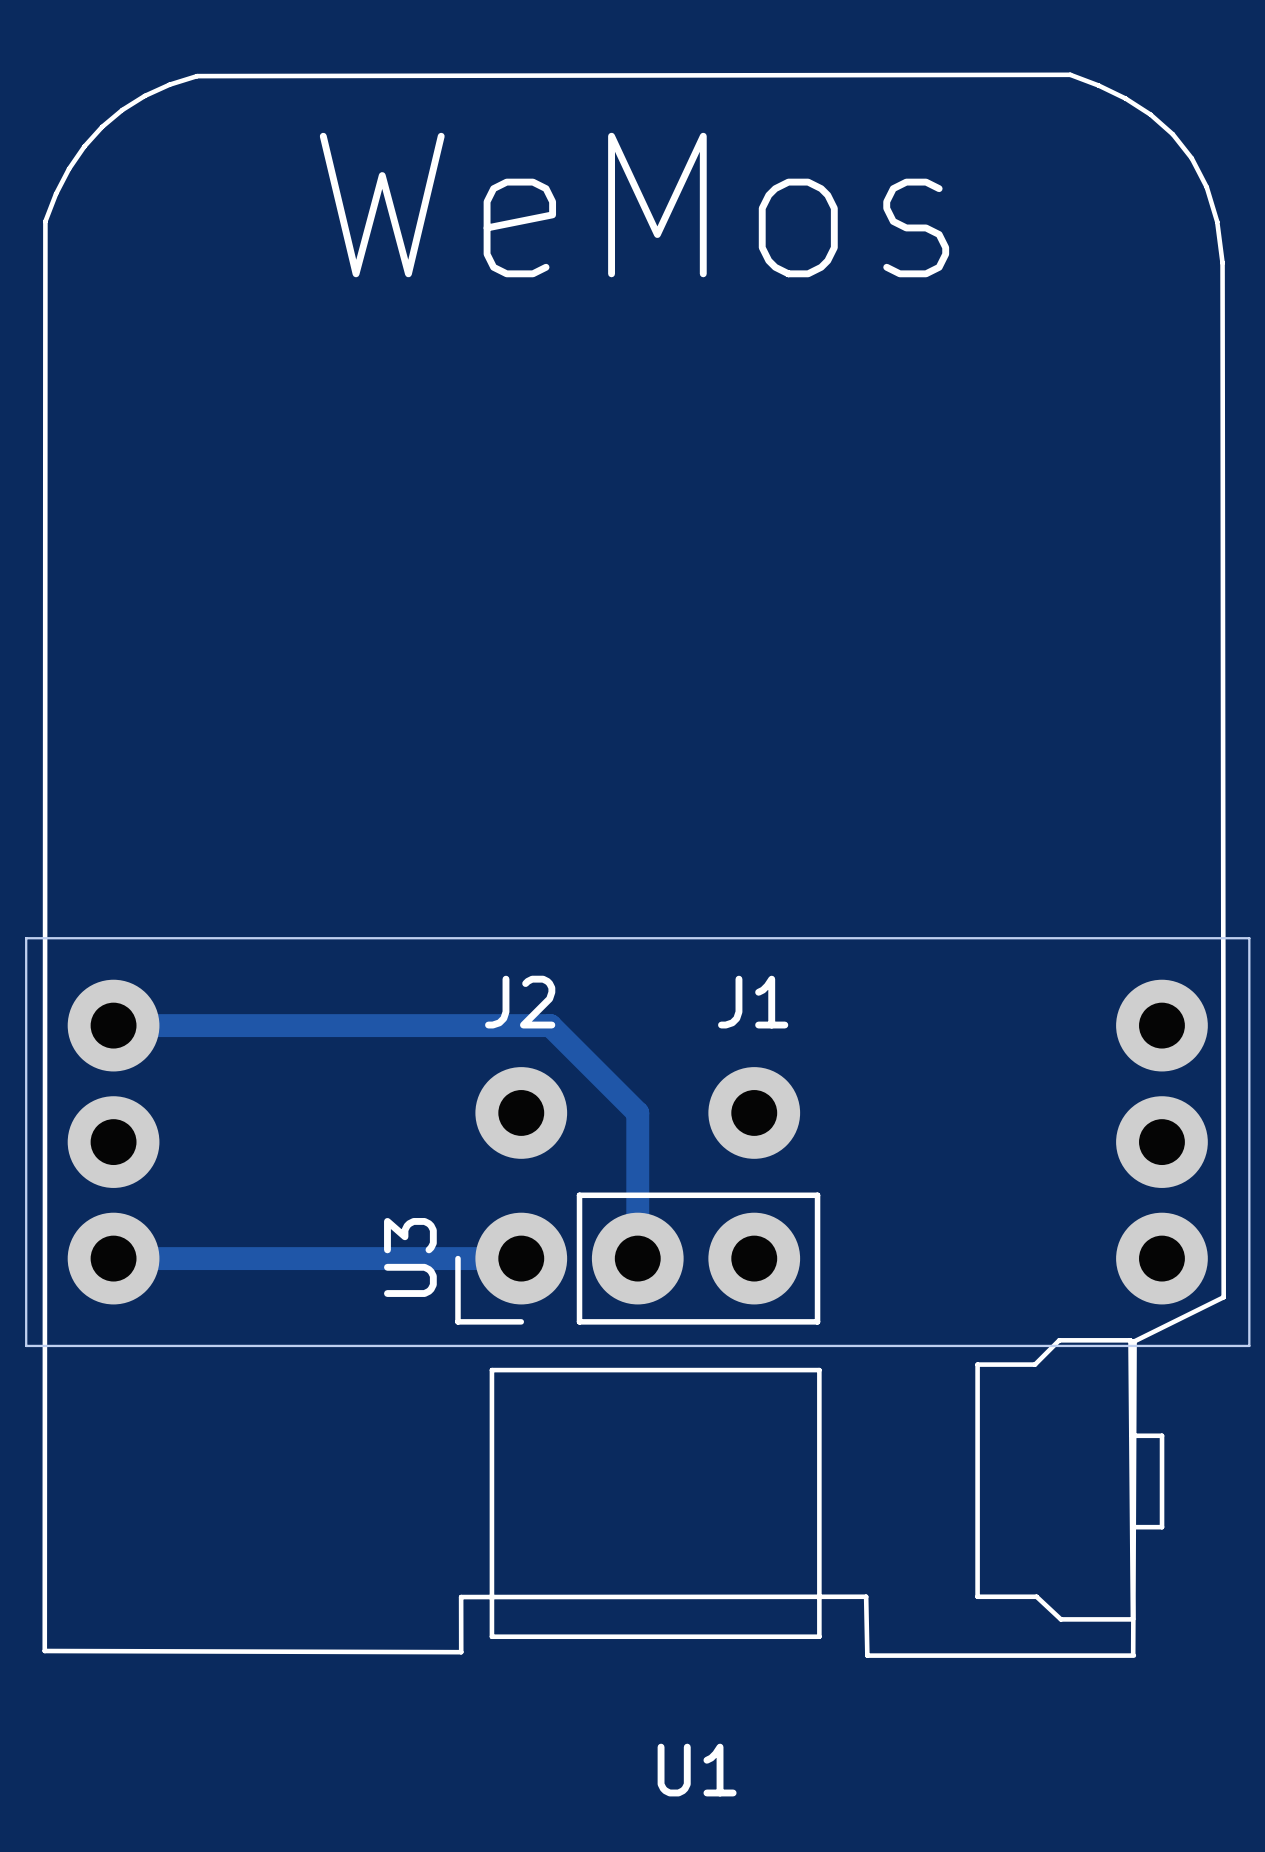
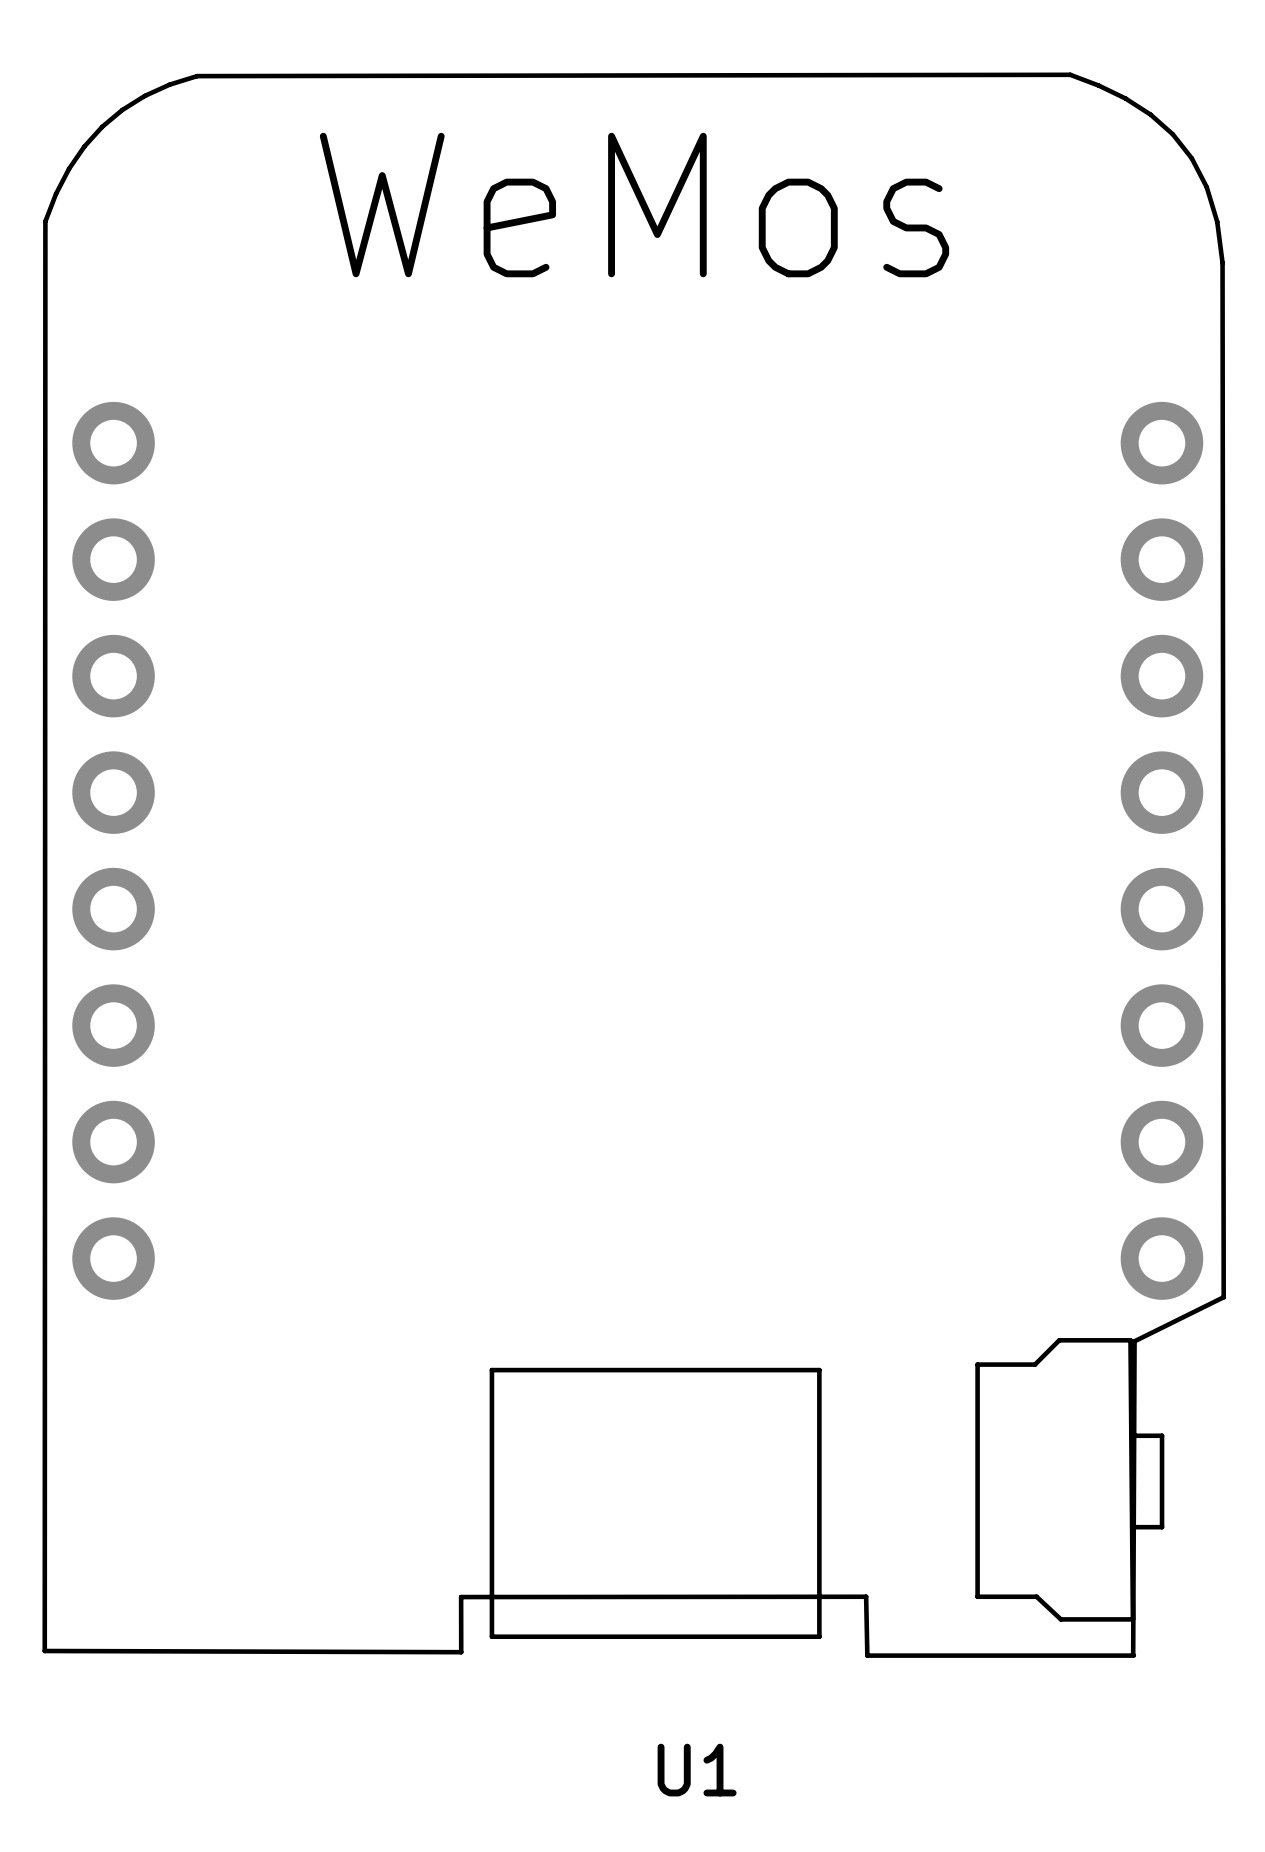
U1 footprint: [42, 72, 1226, 1658] -> [42, 72, 1226, 1658]
board edge: (26, 938) (1249, 938) (1249, 1345) (26, 1345) (26, 938) -> none
track: (113, 1025) (550, 1025) (637, 1112) (637, 1258) -> none
J2: (521, 1112) -> none
J1: (754, 1112) -> none
track: (113, 1258) (521, 1258) -> none
U3: (637, 1258) -> none

